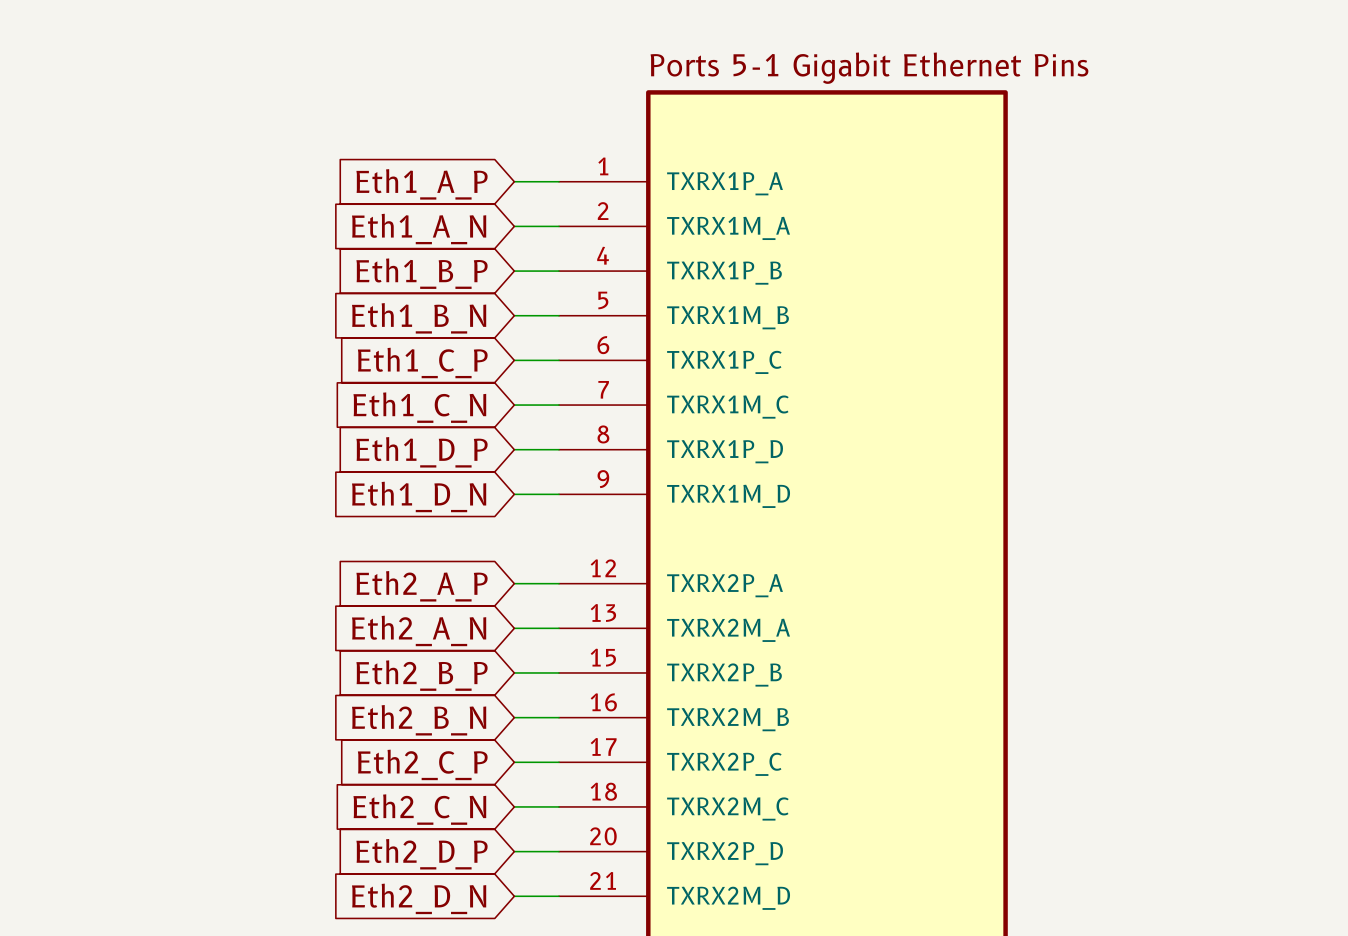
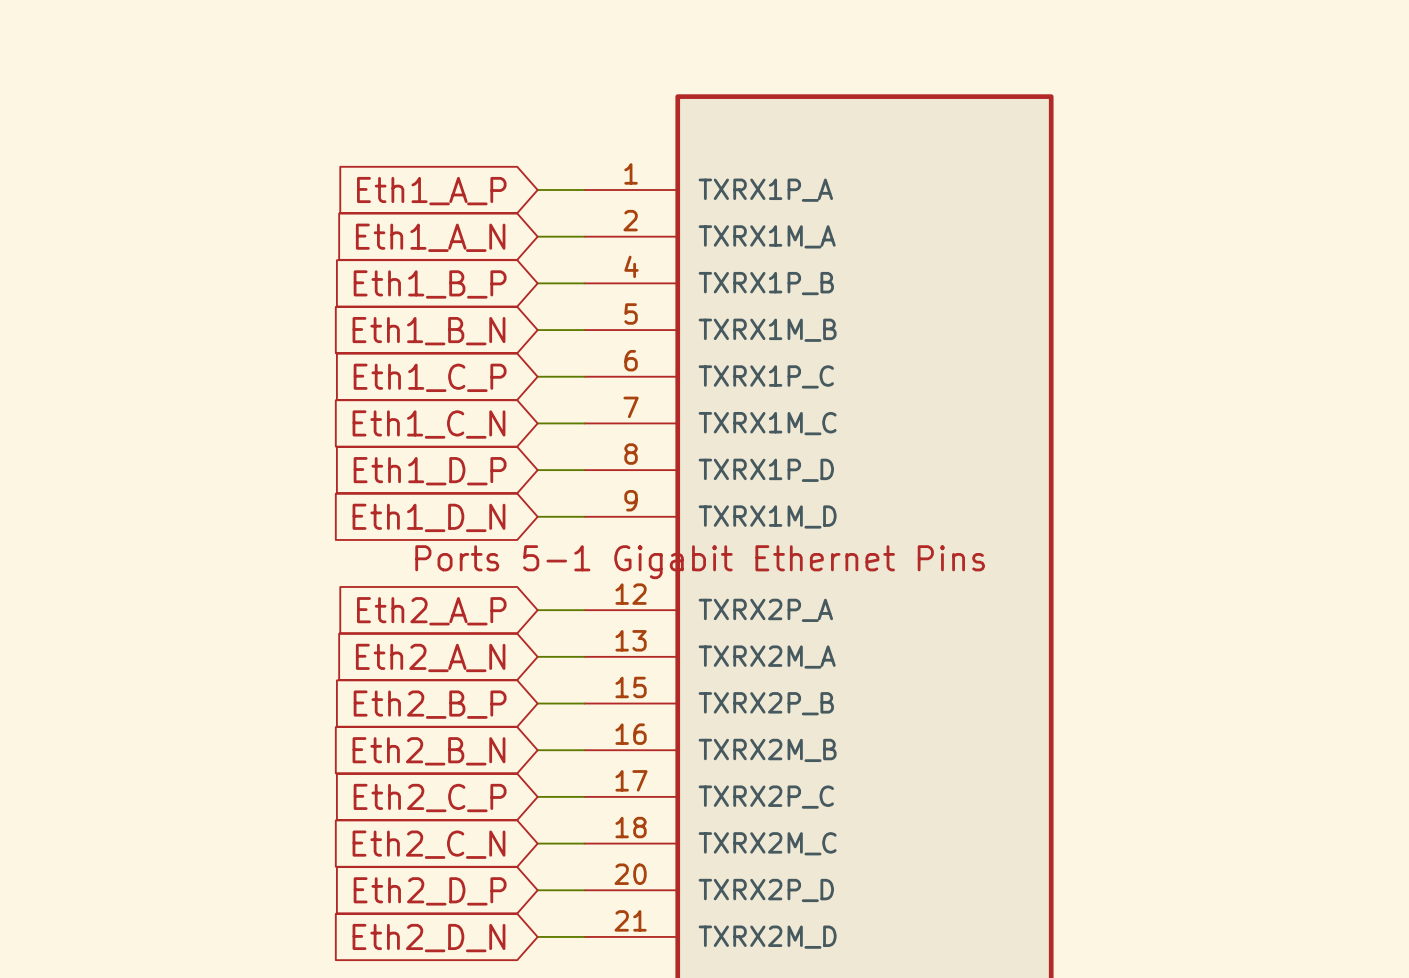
part text position: Ports 5-1 Gigabit Ethernet Pins (869, 68) -> Ports 5-1 Gigabit Ethernet Pins (700, 562)

